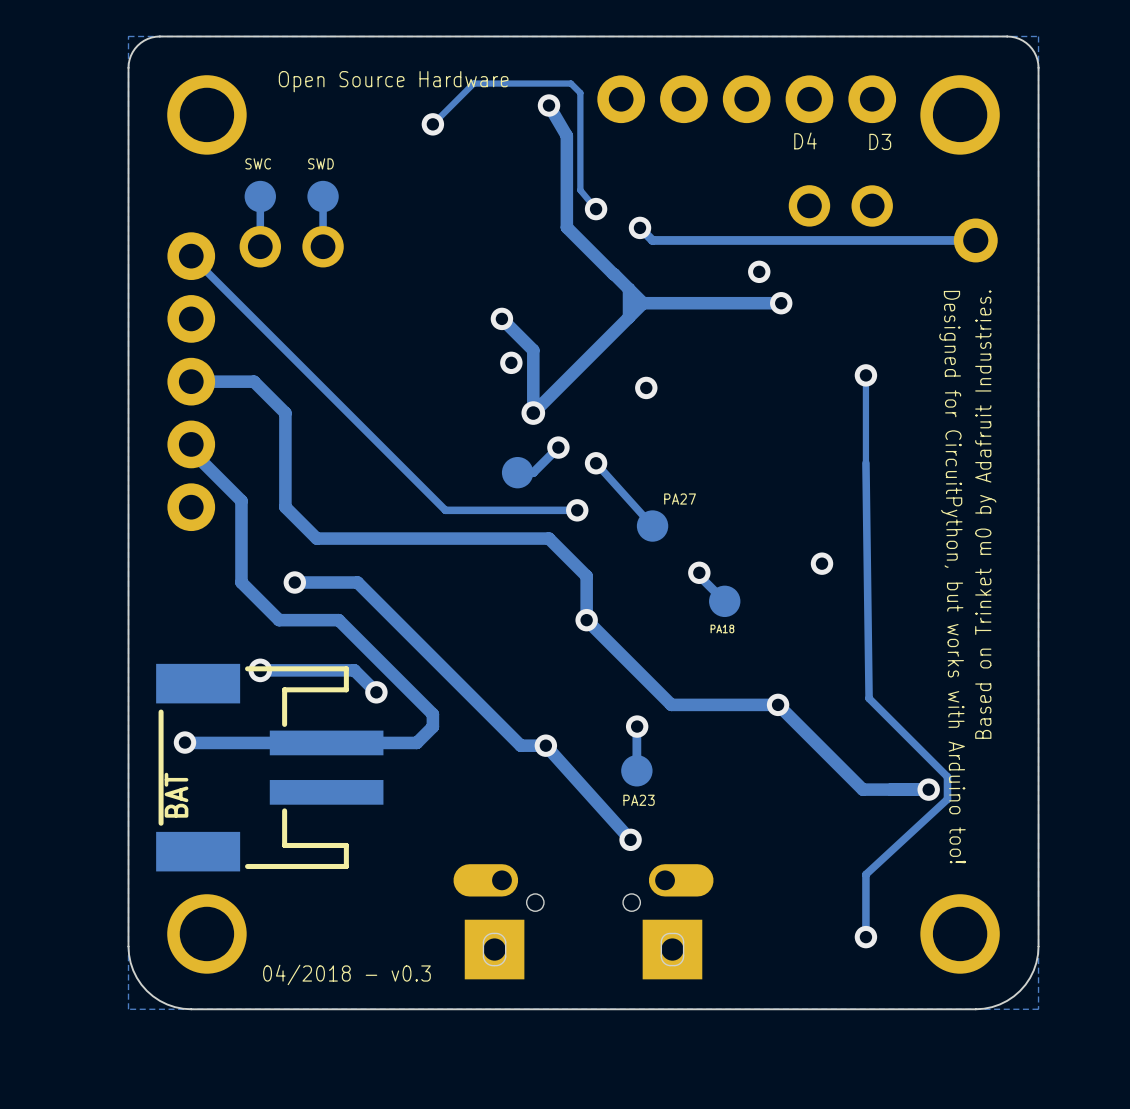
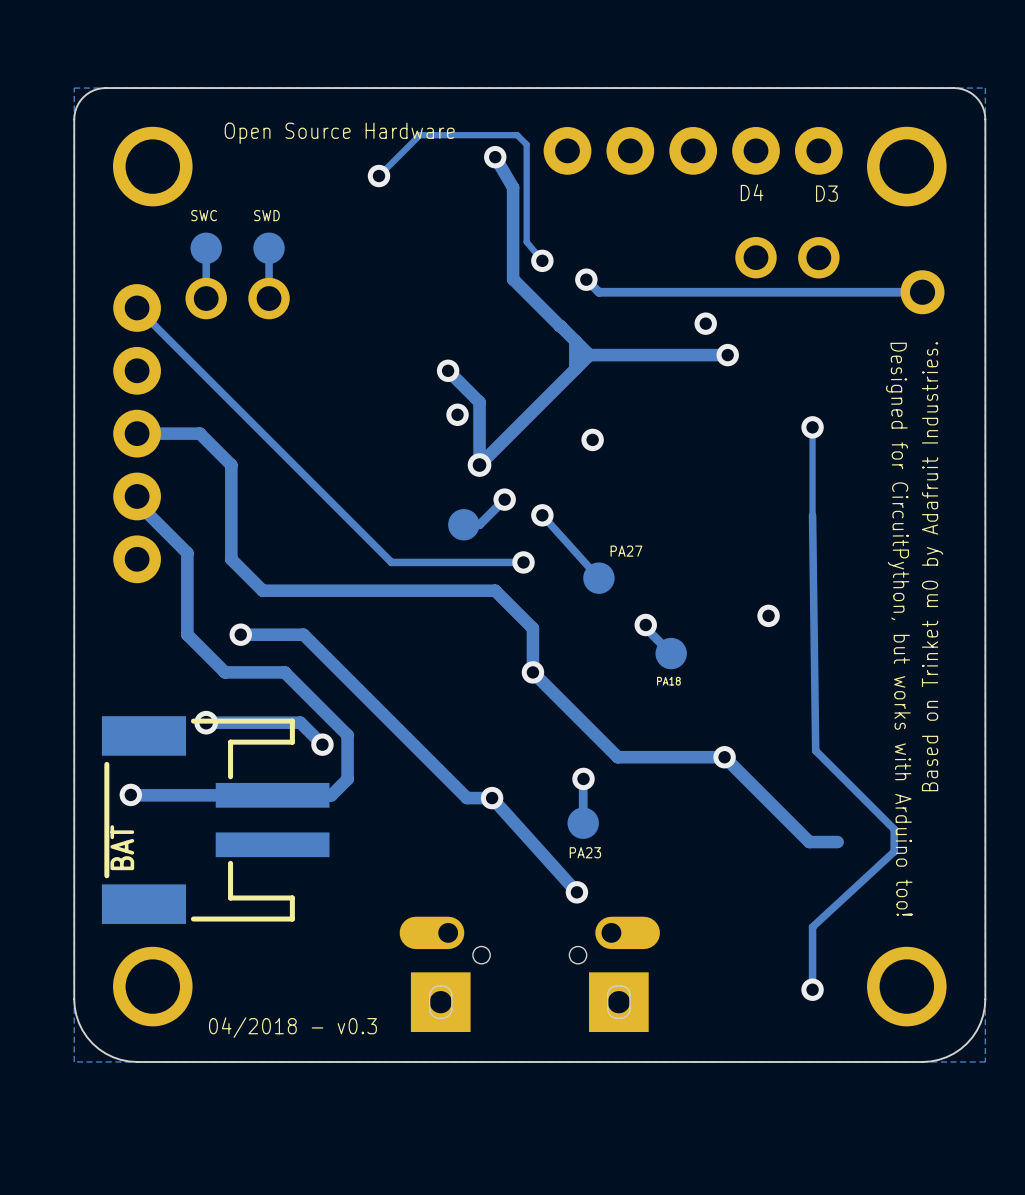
track: (401, 682) (432, 714) (432, 726) (416, 742) (385, 742) -> (347, 735) (347, 779) (331, 795)
track: (928, 789) (891, 789) -> none
via: (928, 789) -> none

